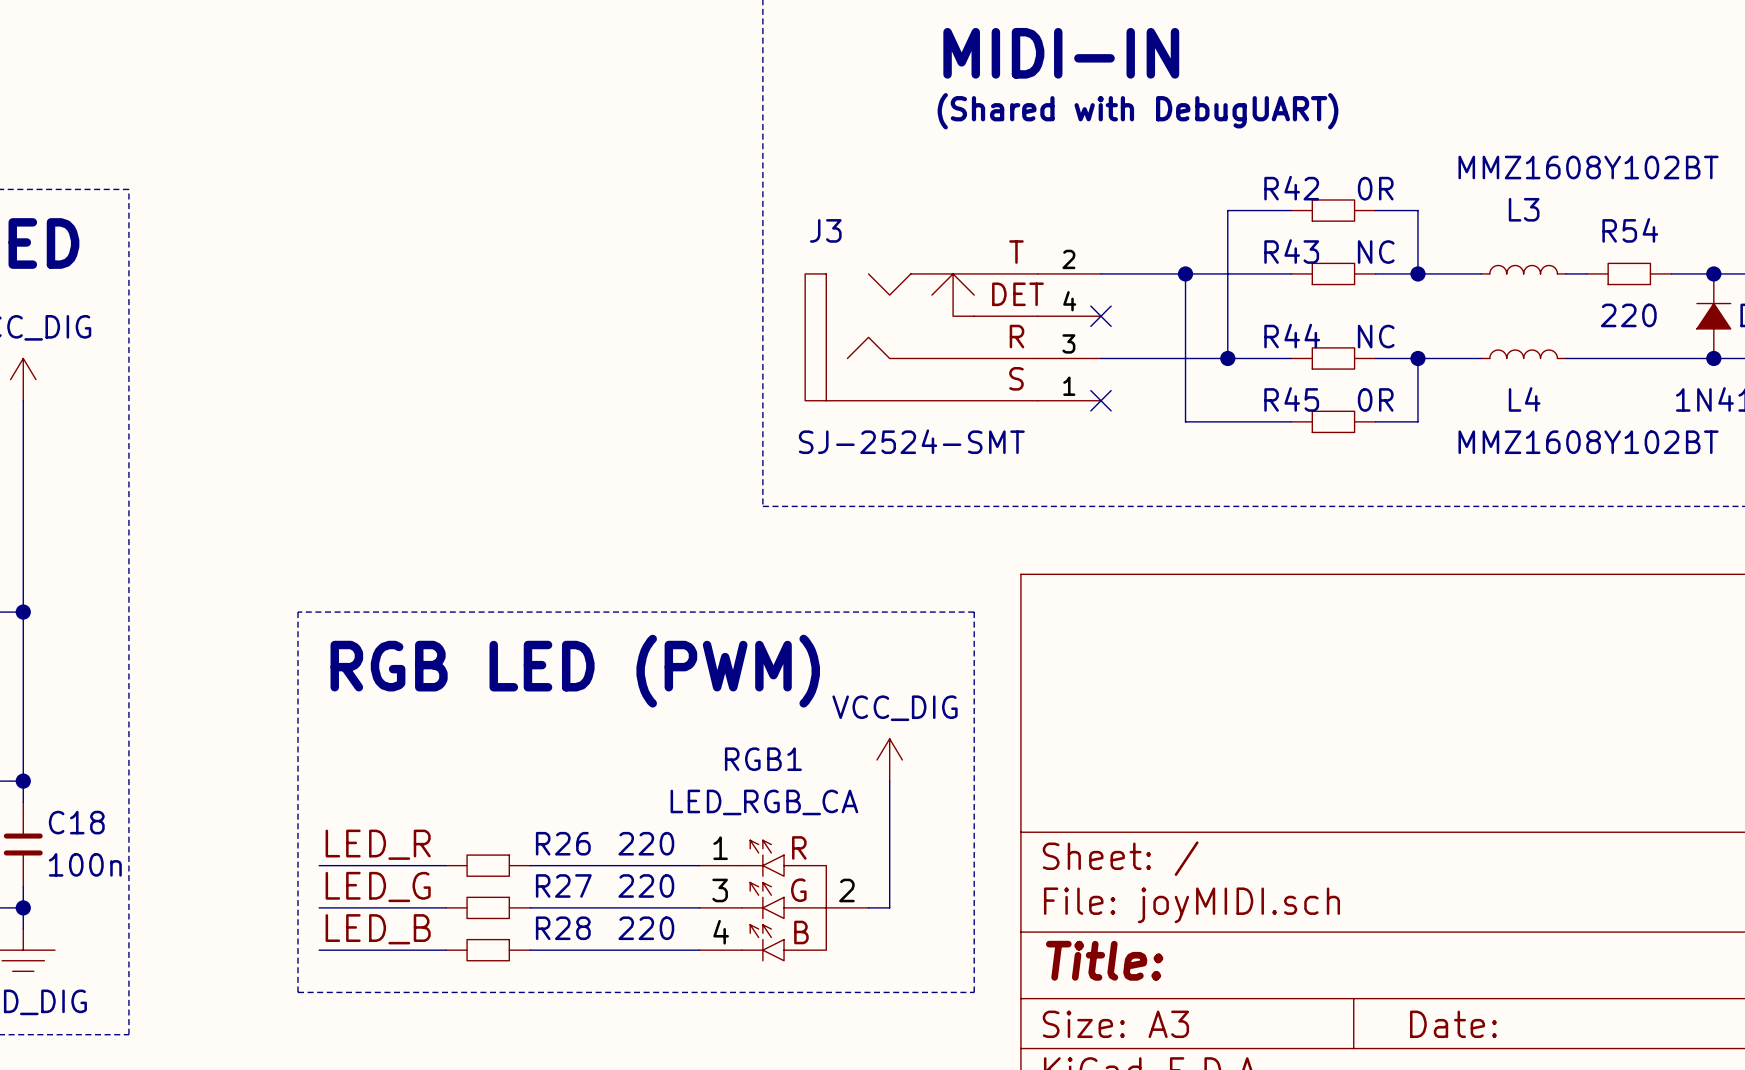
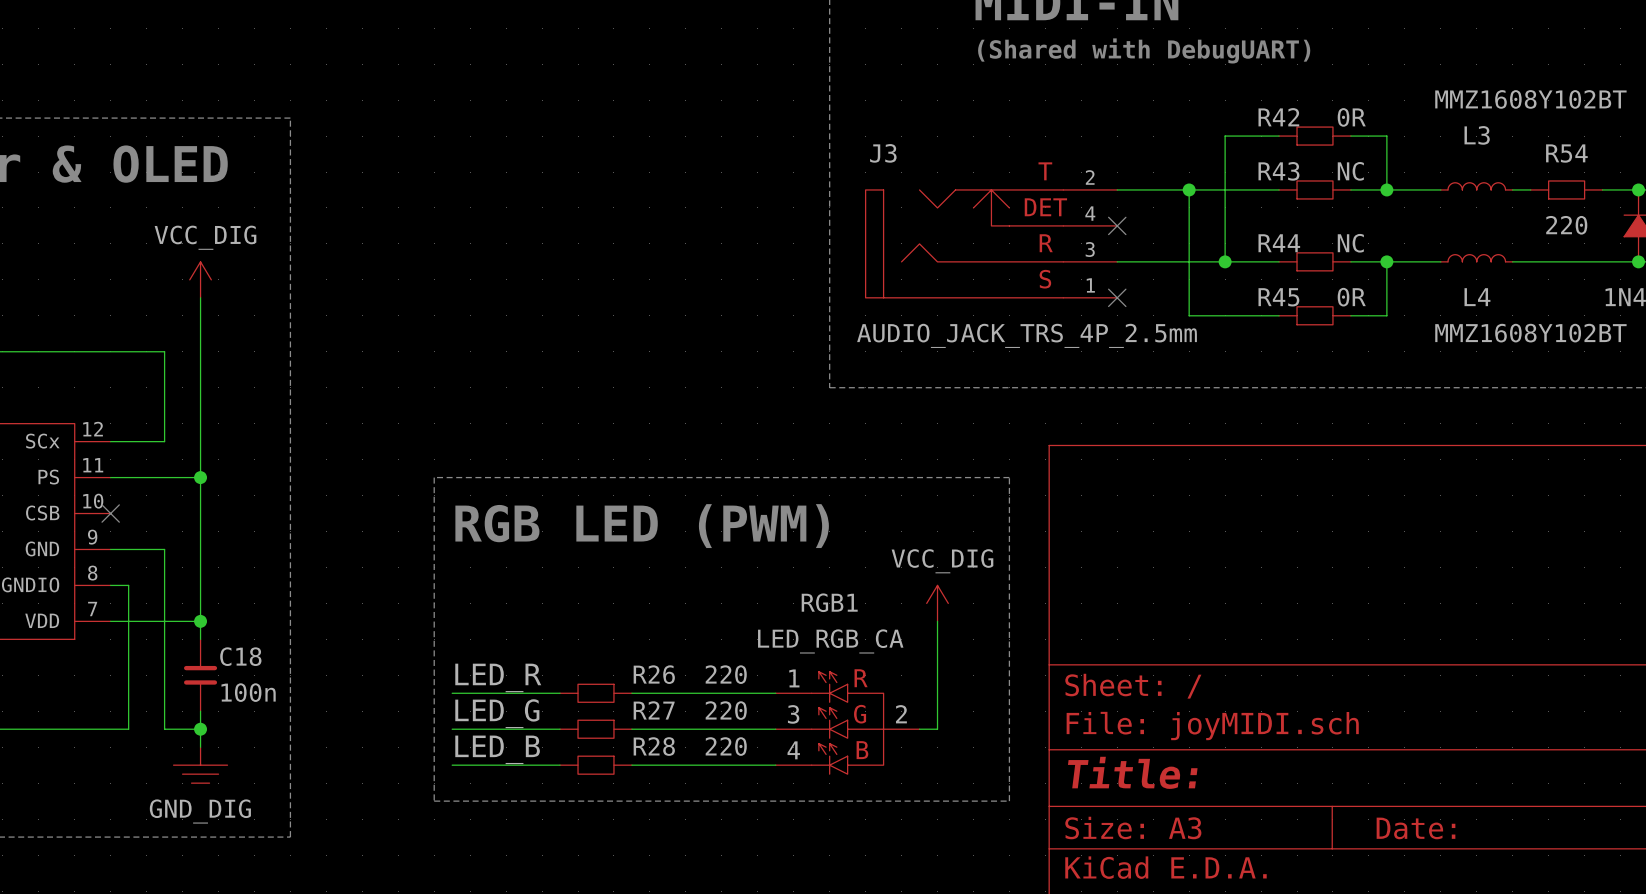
J3 value: SJ-2524-SMT (911, 441) -> AUDIO_JACK_TRS_4P_2.5mm (1027, 335)

